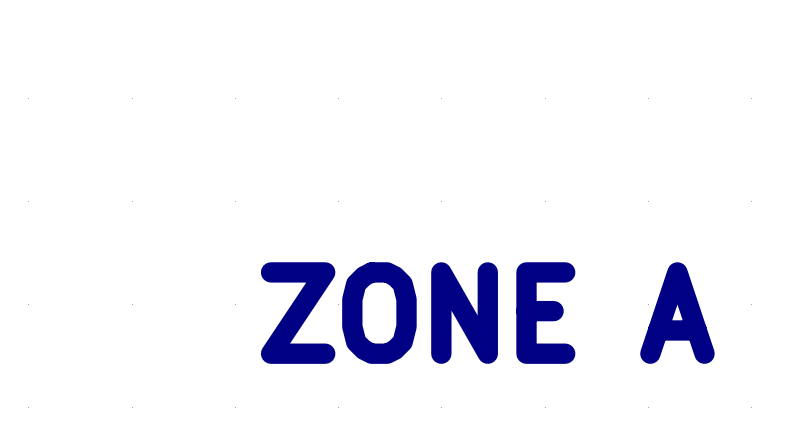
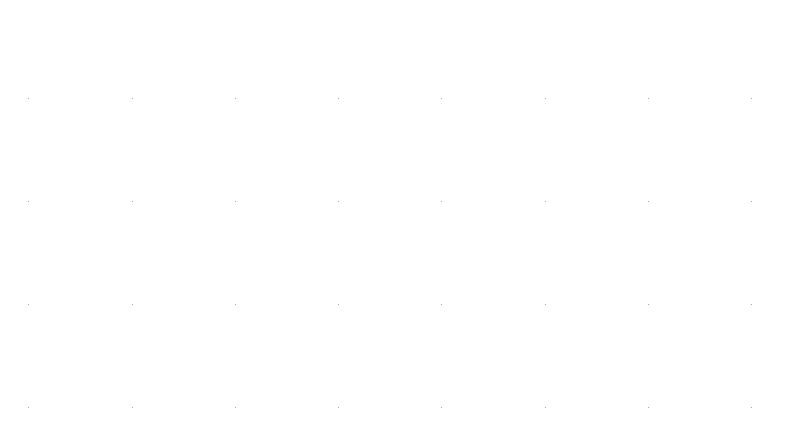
text: ZONE A (487, 313) -> none

